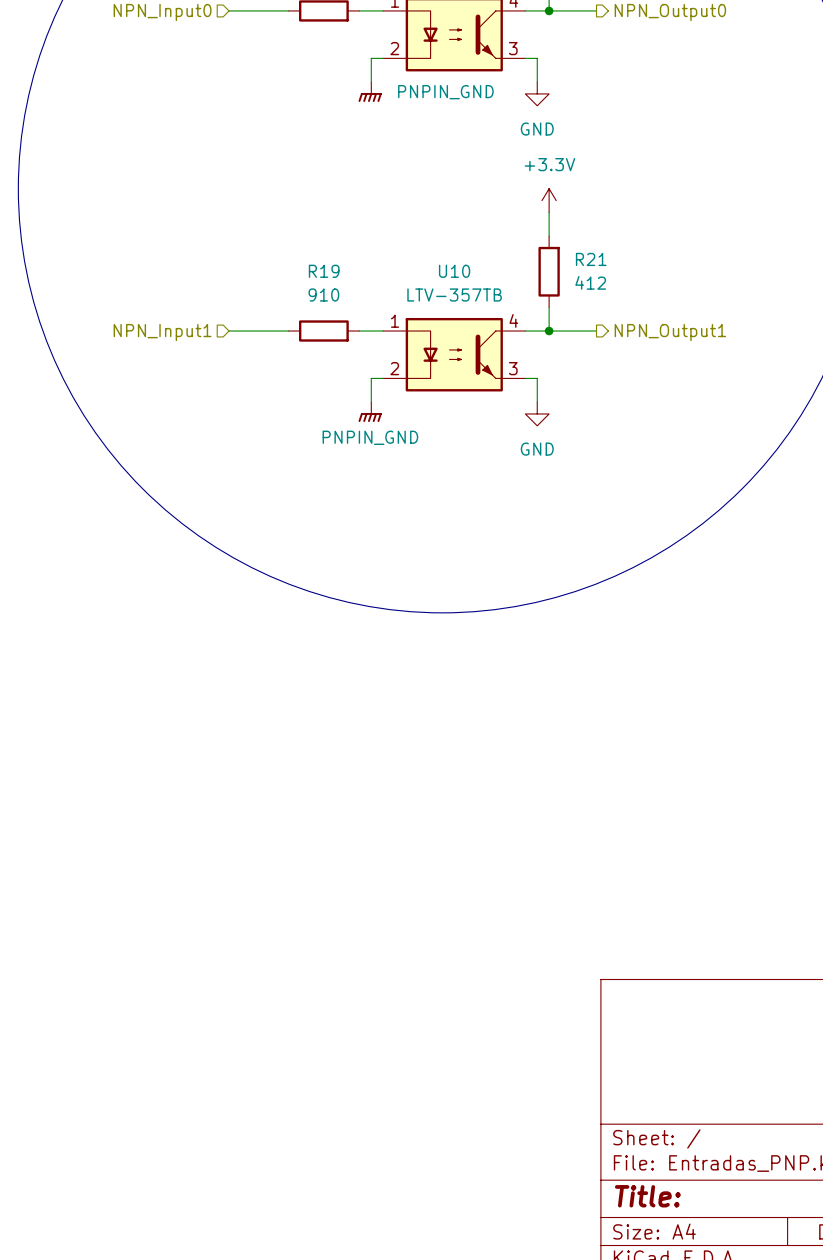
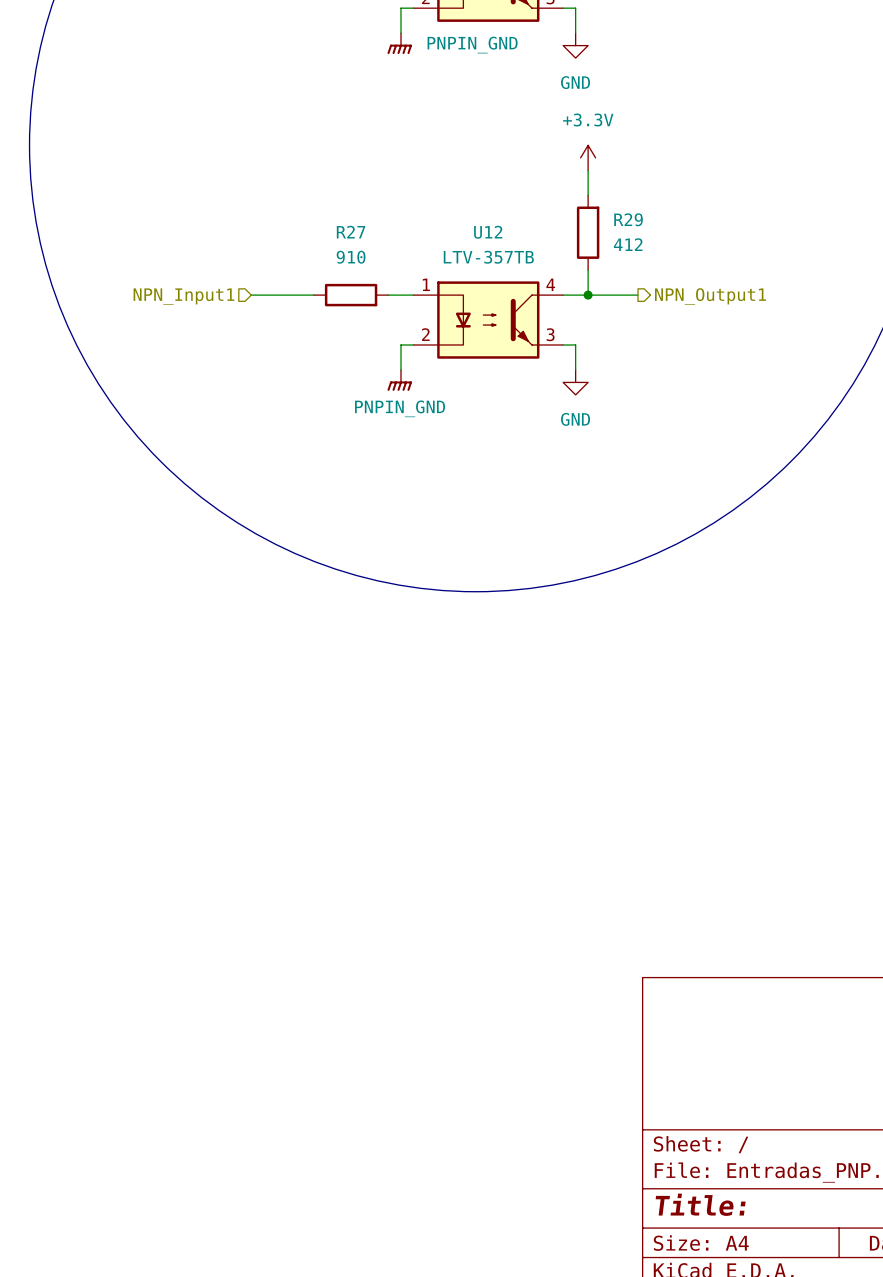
R21 name: R21 (591, 259) -> R29 (628, 219)
R19 name: R19 (324, 271) -> R27 (351, 232)
U10 name: U10 (454, 271) -> U12 (488, 232)

